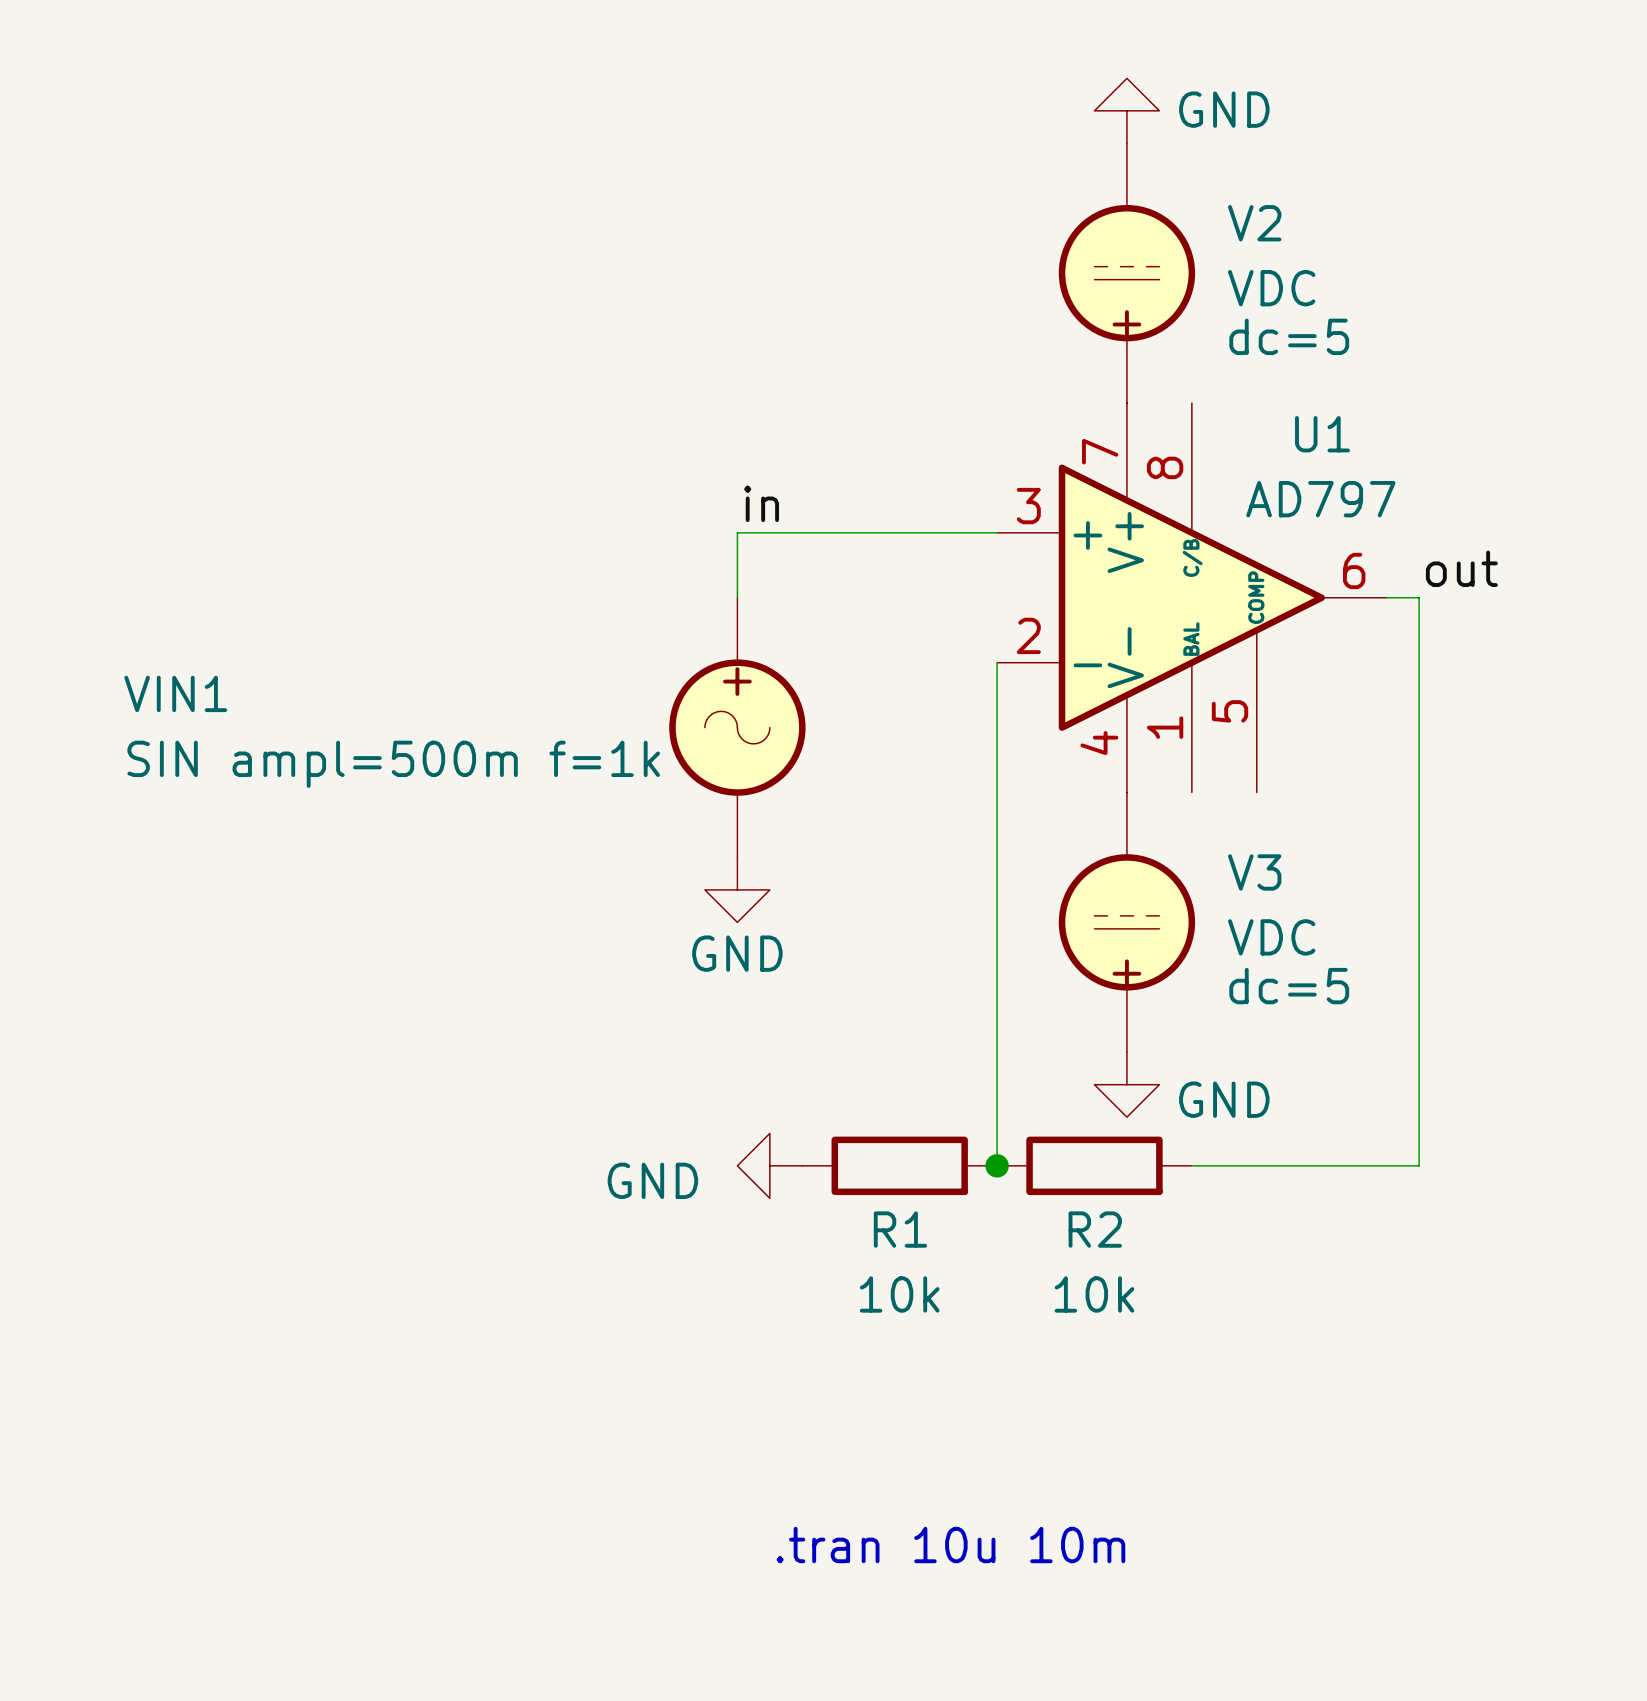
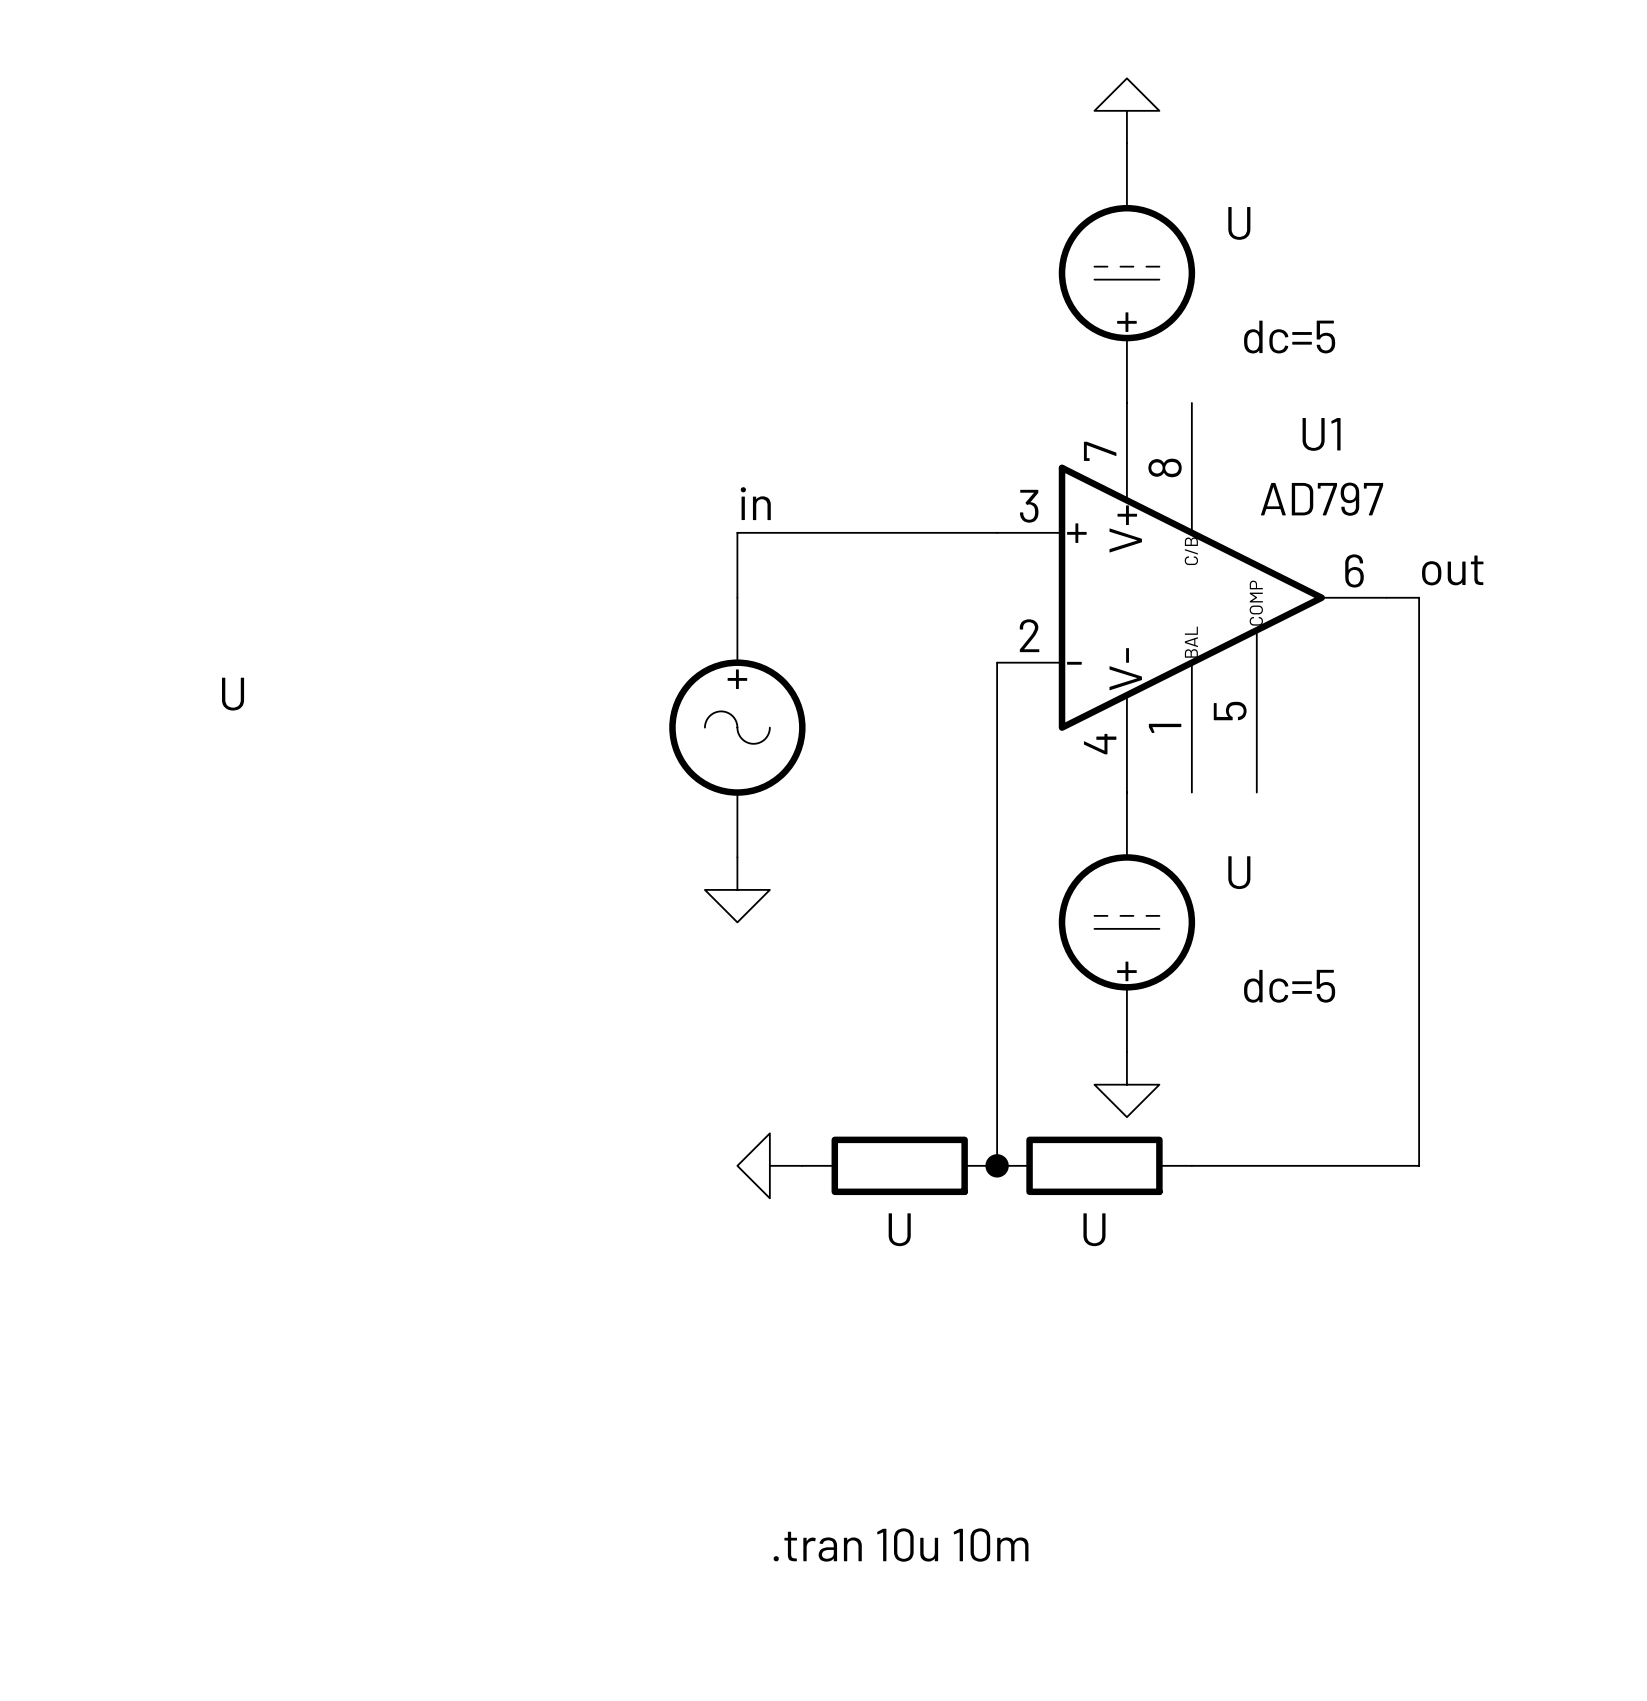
power symbol text: GND (1224, 109) -> none
V2 name: V2 (1254, 223) -> U (1239, 223)
V2 value: VDC (1271, 288) -> none
VIN1 name: VIN1 (175, 693) -> U (233, 694)
VIN1 value: SIN ampl=500m f=1k (393, 764) -> none
V3 name: V3 (1254, 872) -> U (1239, 872)
V3 value: VDC (1271, 937) -> none
power symbol text: GND (737, 953) -> none
power symbol text: GND (1224, 1099) -> none
power symbol text: GND (652, 1180) -> none
R1 name: R1 (900, 1229) -> U (899, 1229)
R2 name: R2 (1095, 1229) -> U (1094, 1229)
R1 value: 10k (899, 1294) -> none
R2 value: 10k (1094, 1294) -> none

